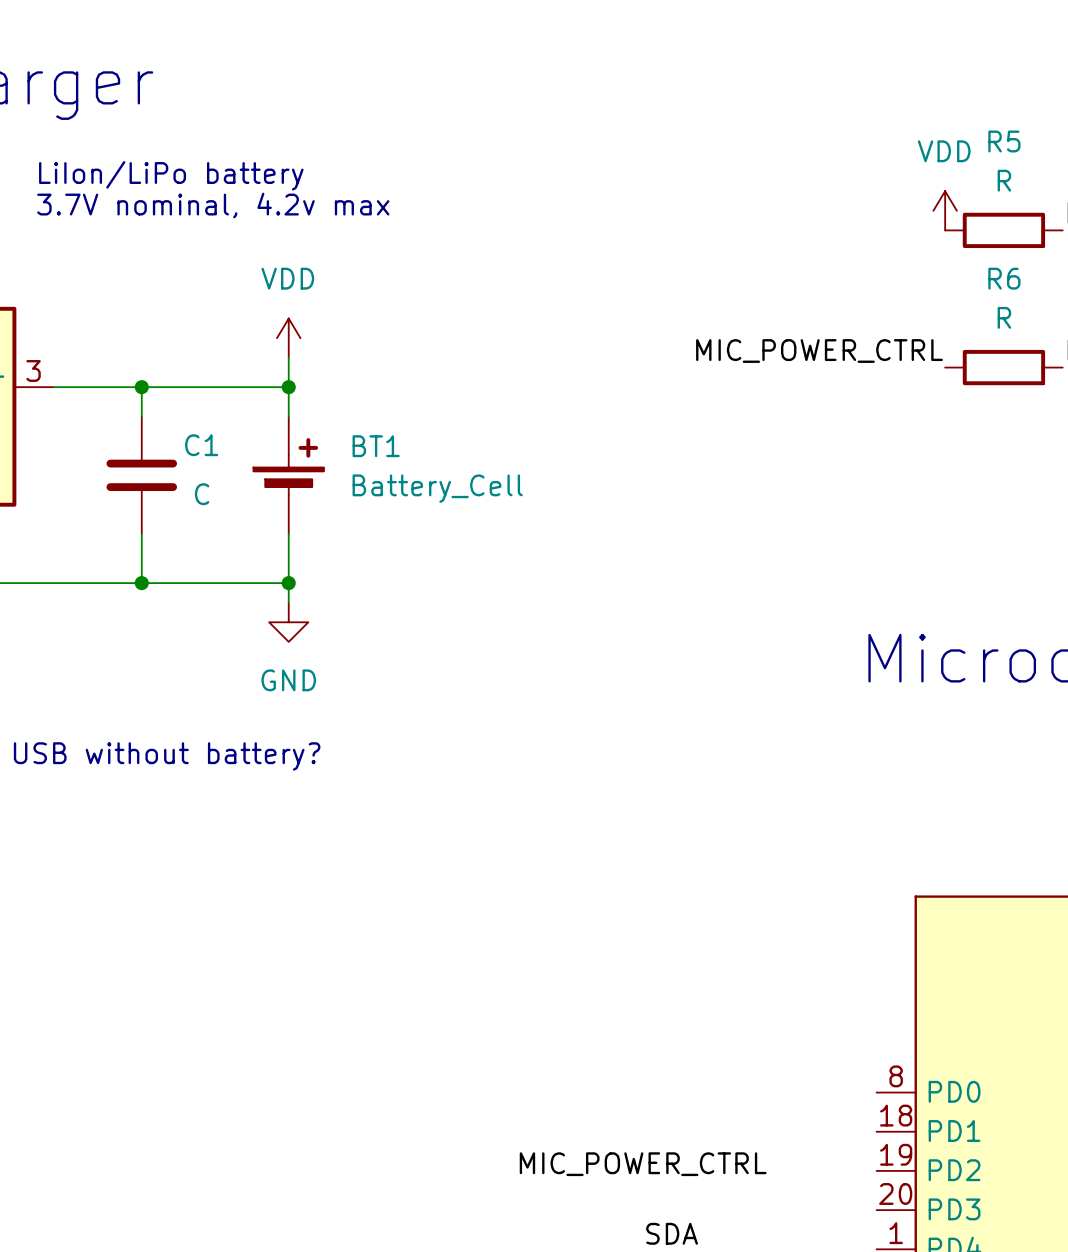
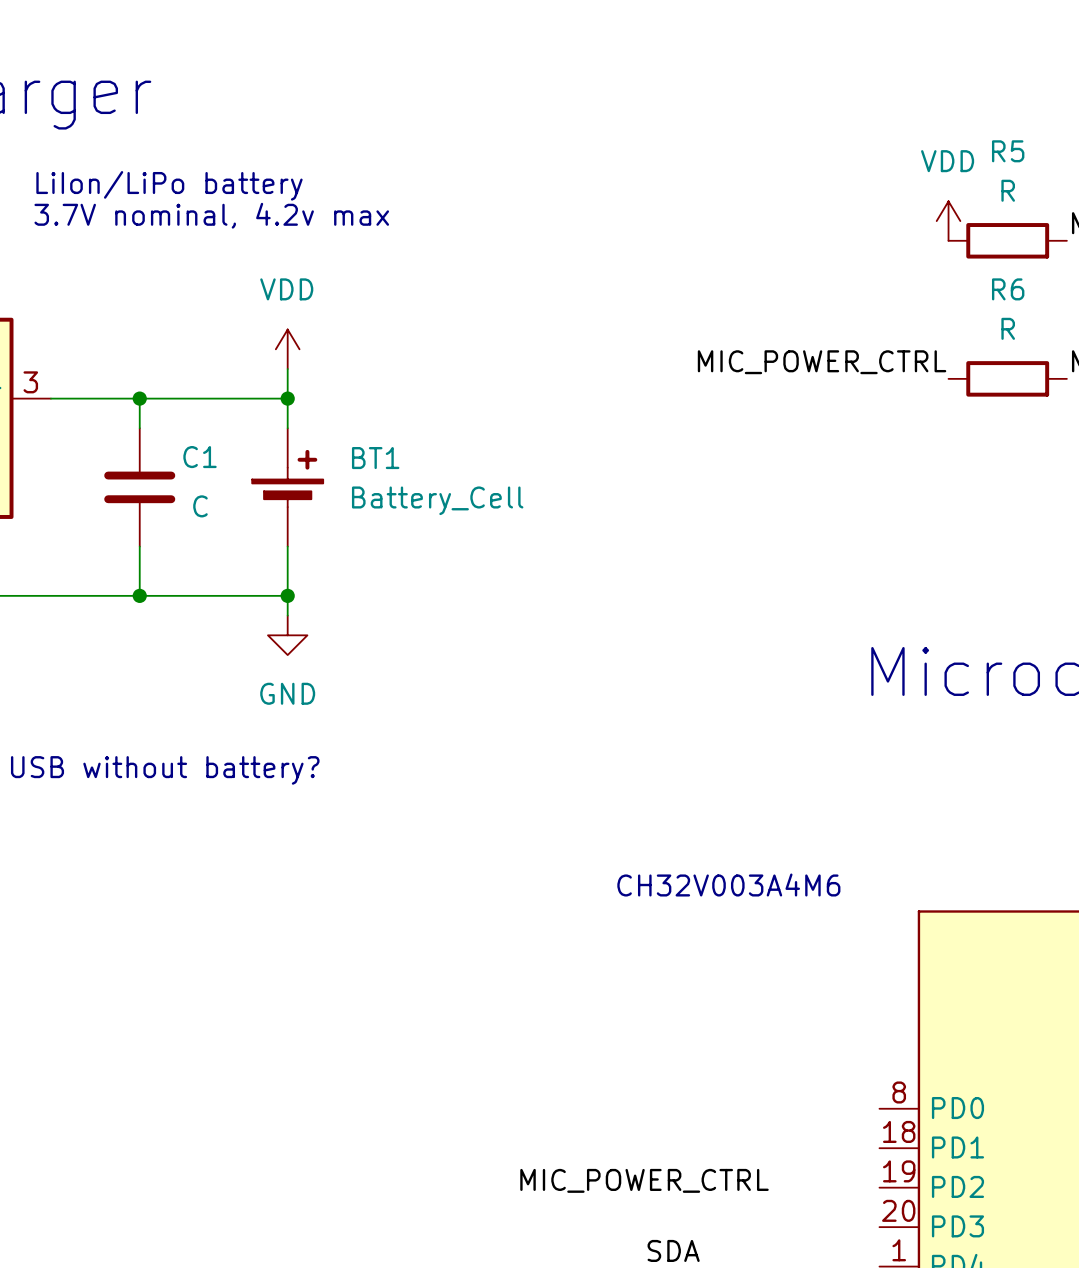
text: none -> CH32V003A4M6 (728, 885)

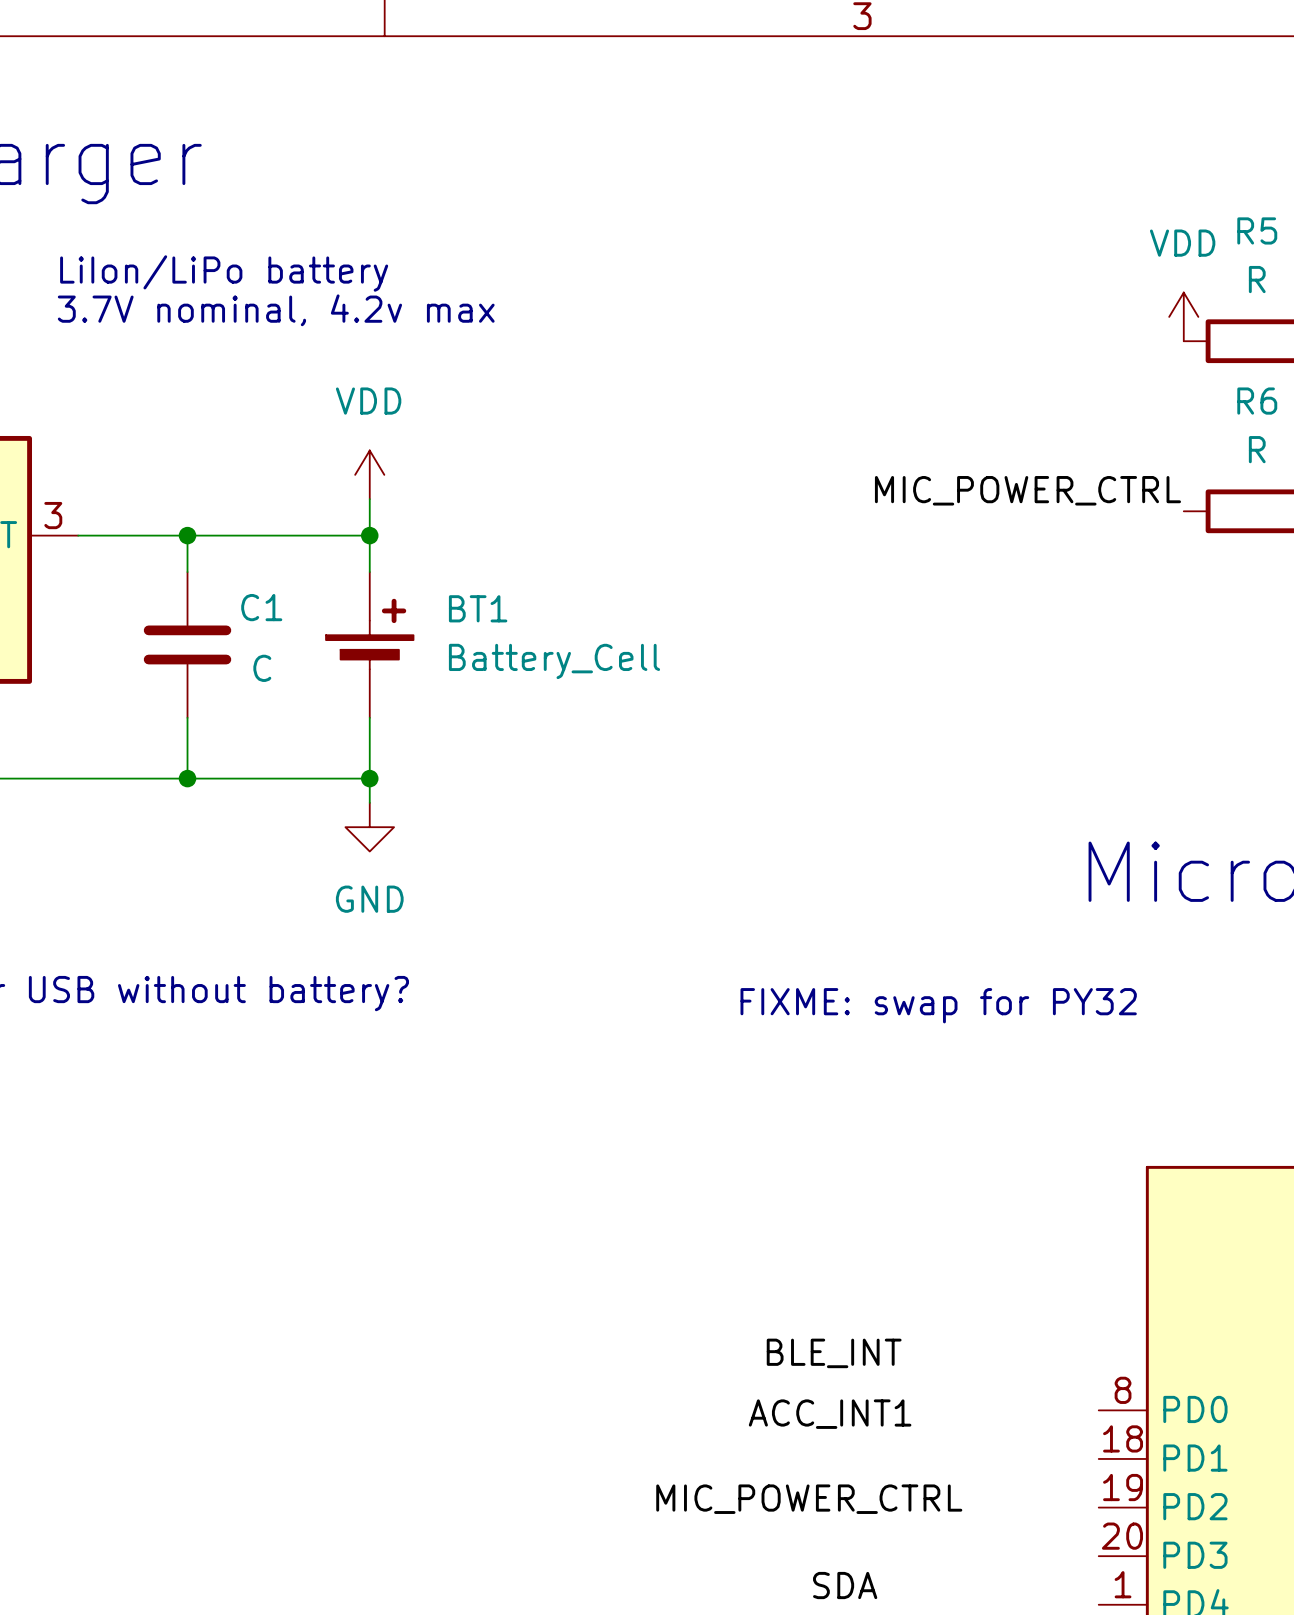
text: none -> FIXME: swap for PY32 (938, 1005)
text: CH32V003A4M6 (728, 885) -> none
label: none -> BLE_INT (834, 1353)
label: none -> ACC_INT1 (830, 1414)

